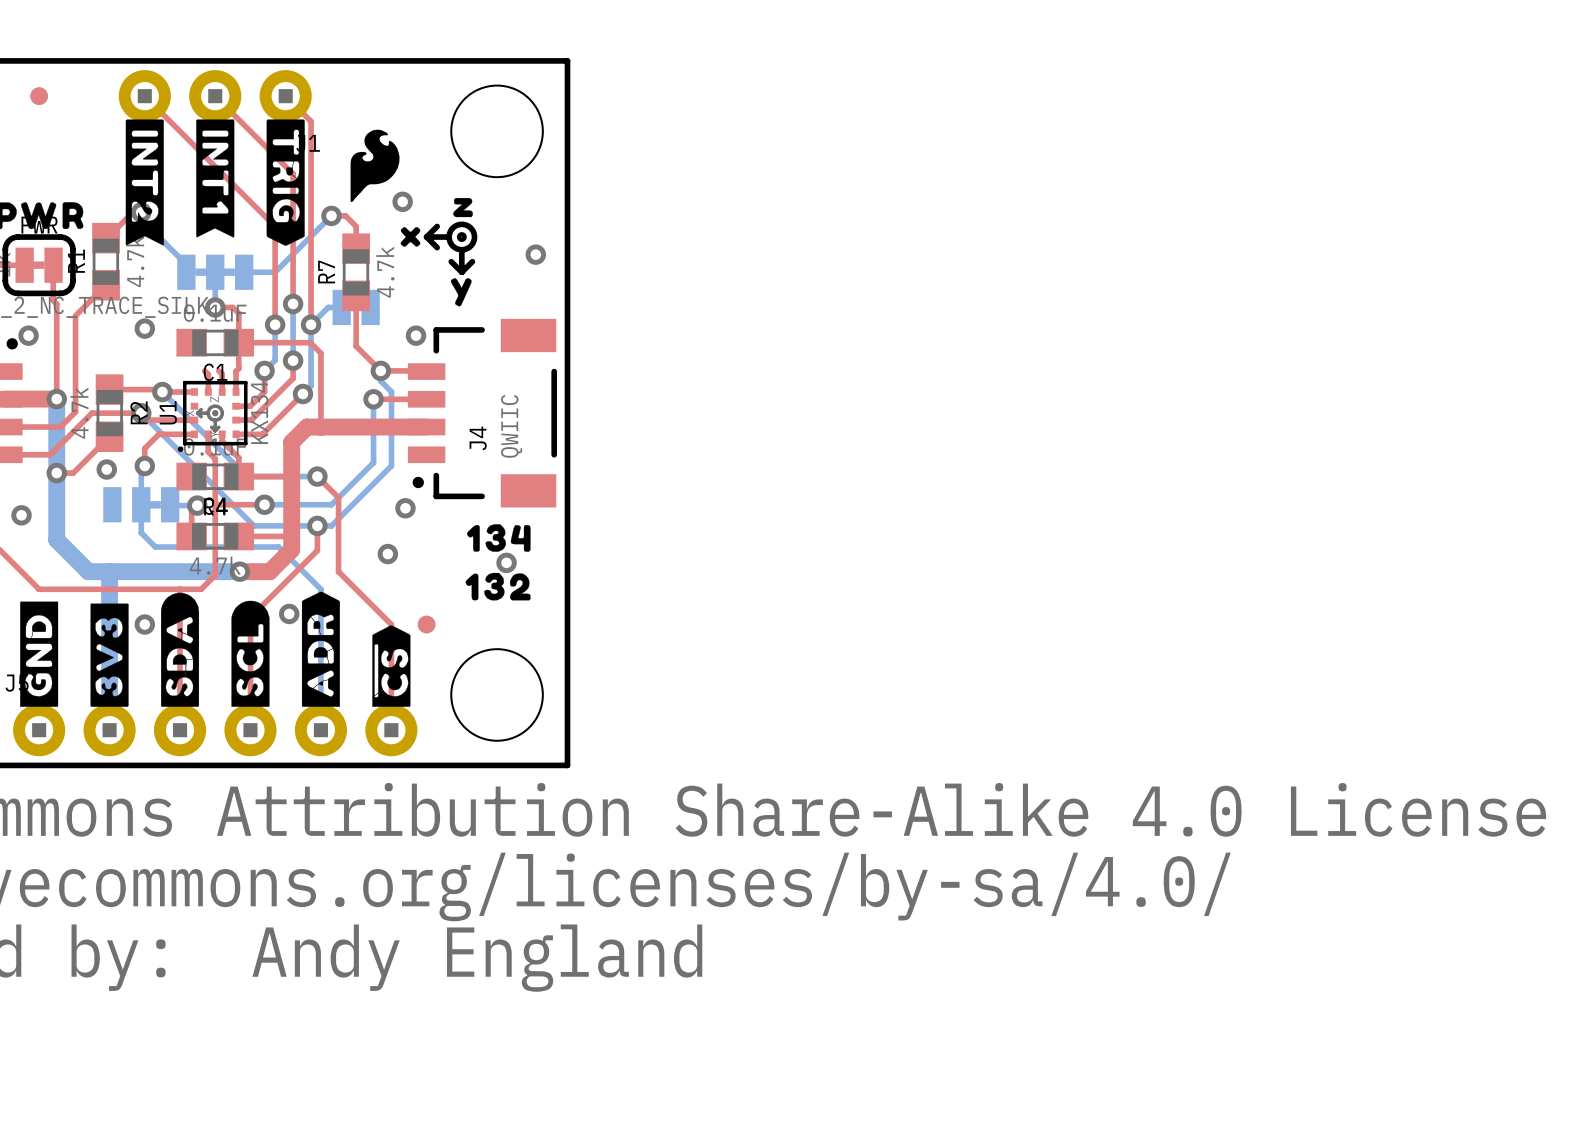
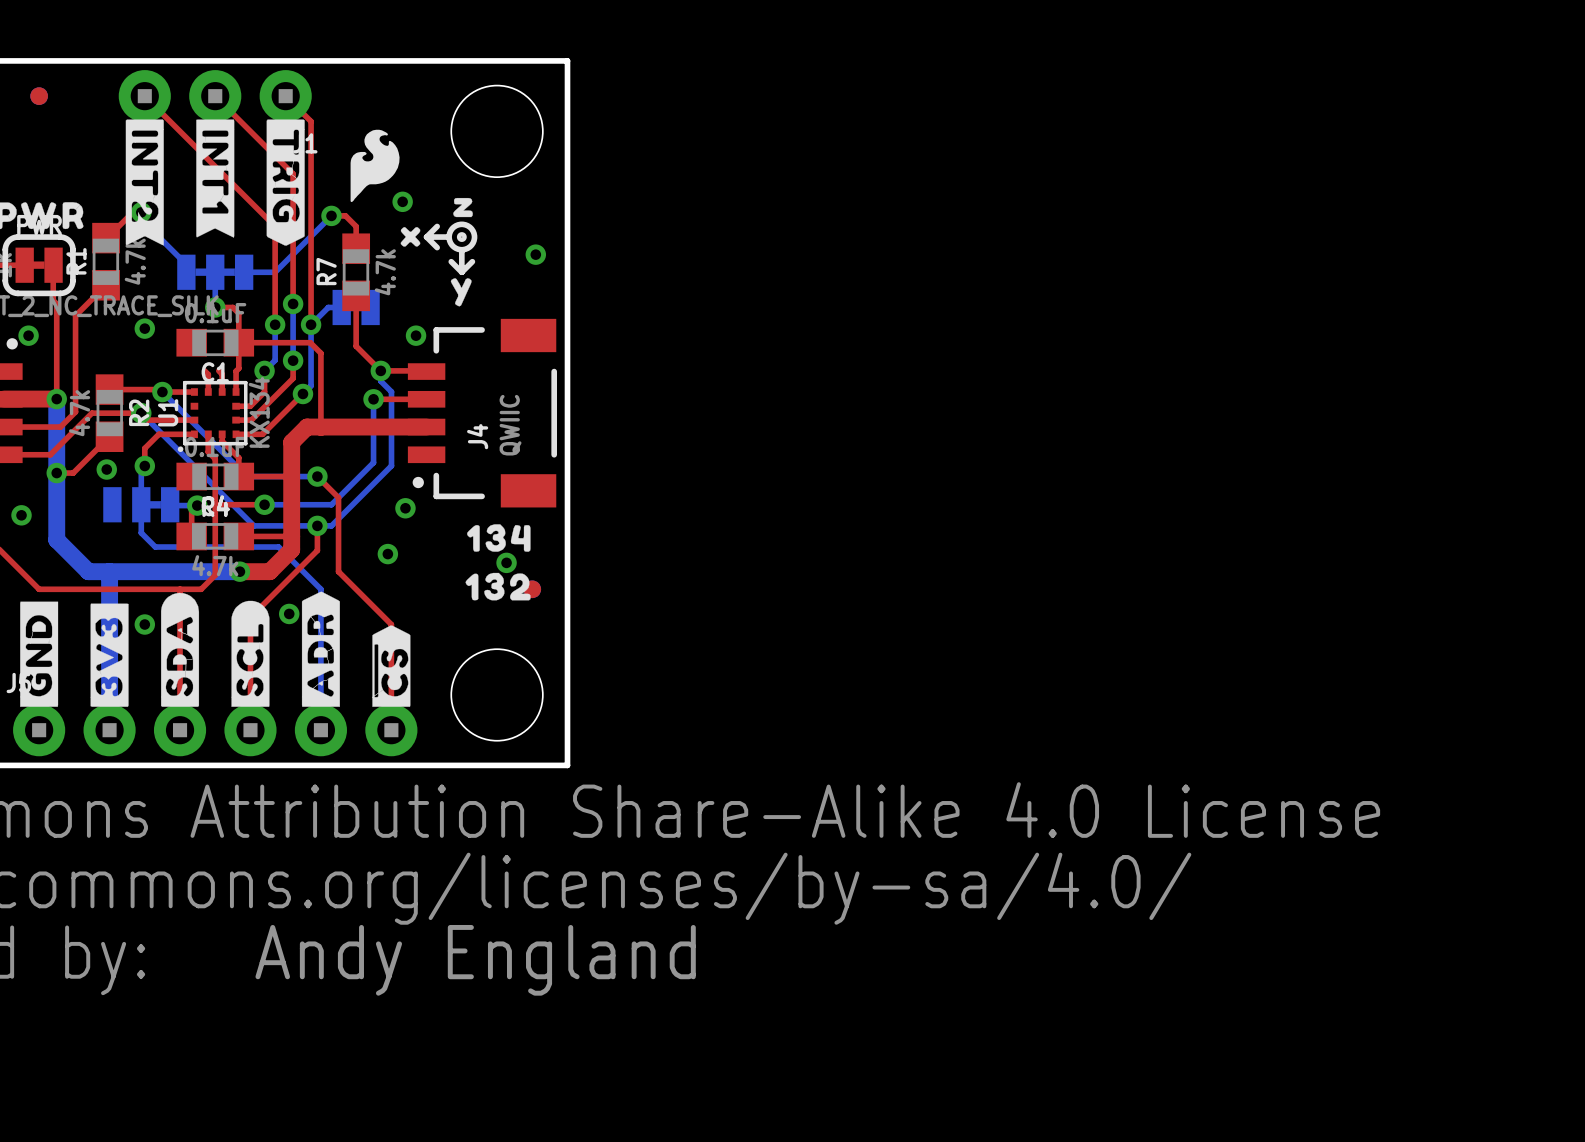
U1 footprint: [177, 380, 248, 452] -> [177, 380, 248, 452]
part position: (426, 624) -> (532, 589)

